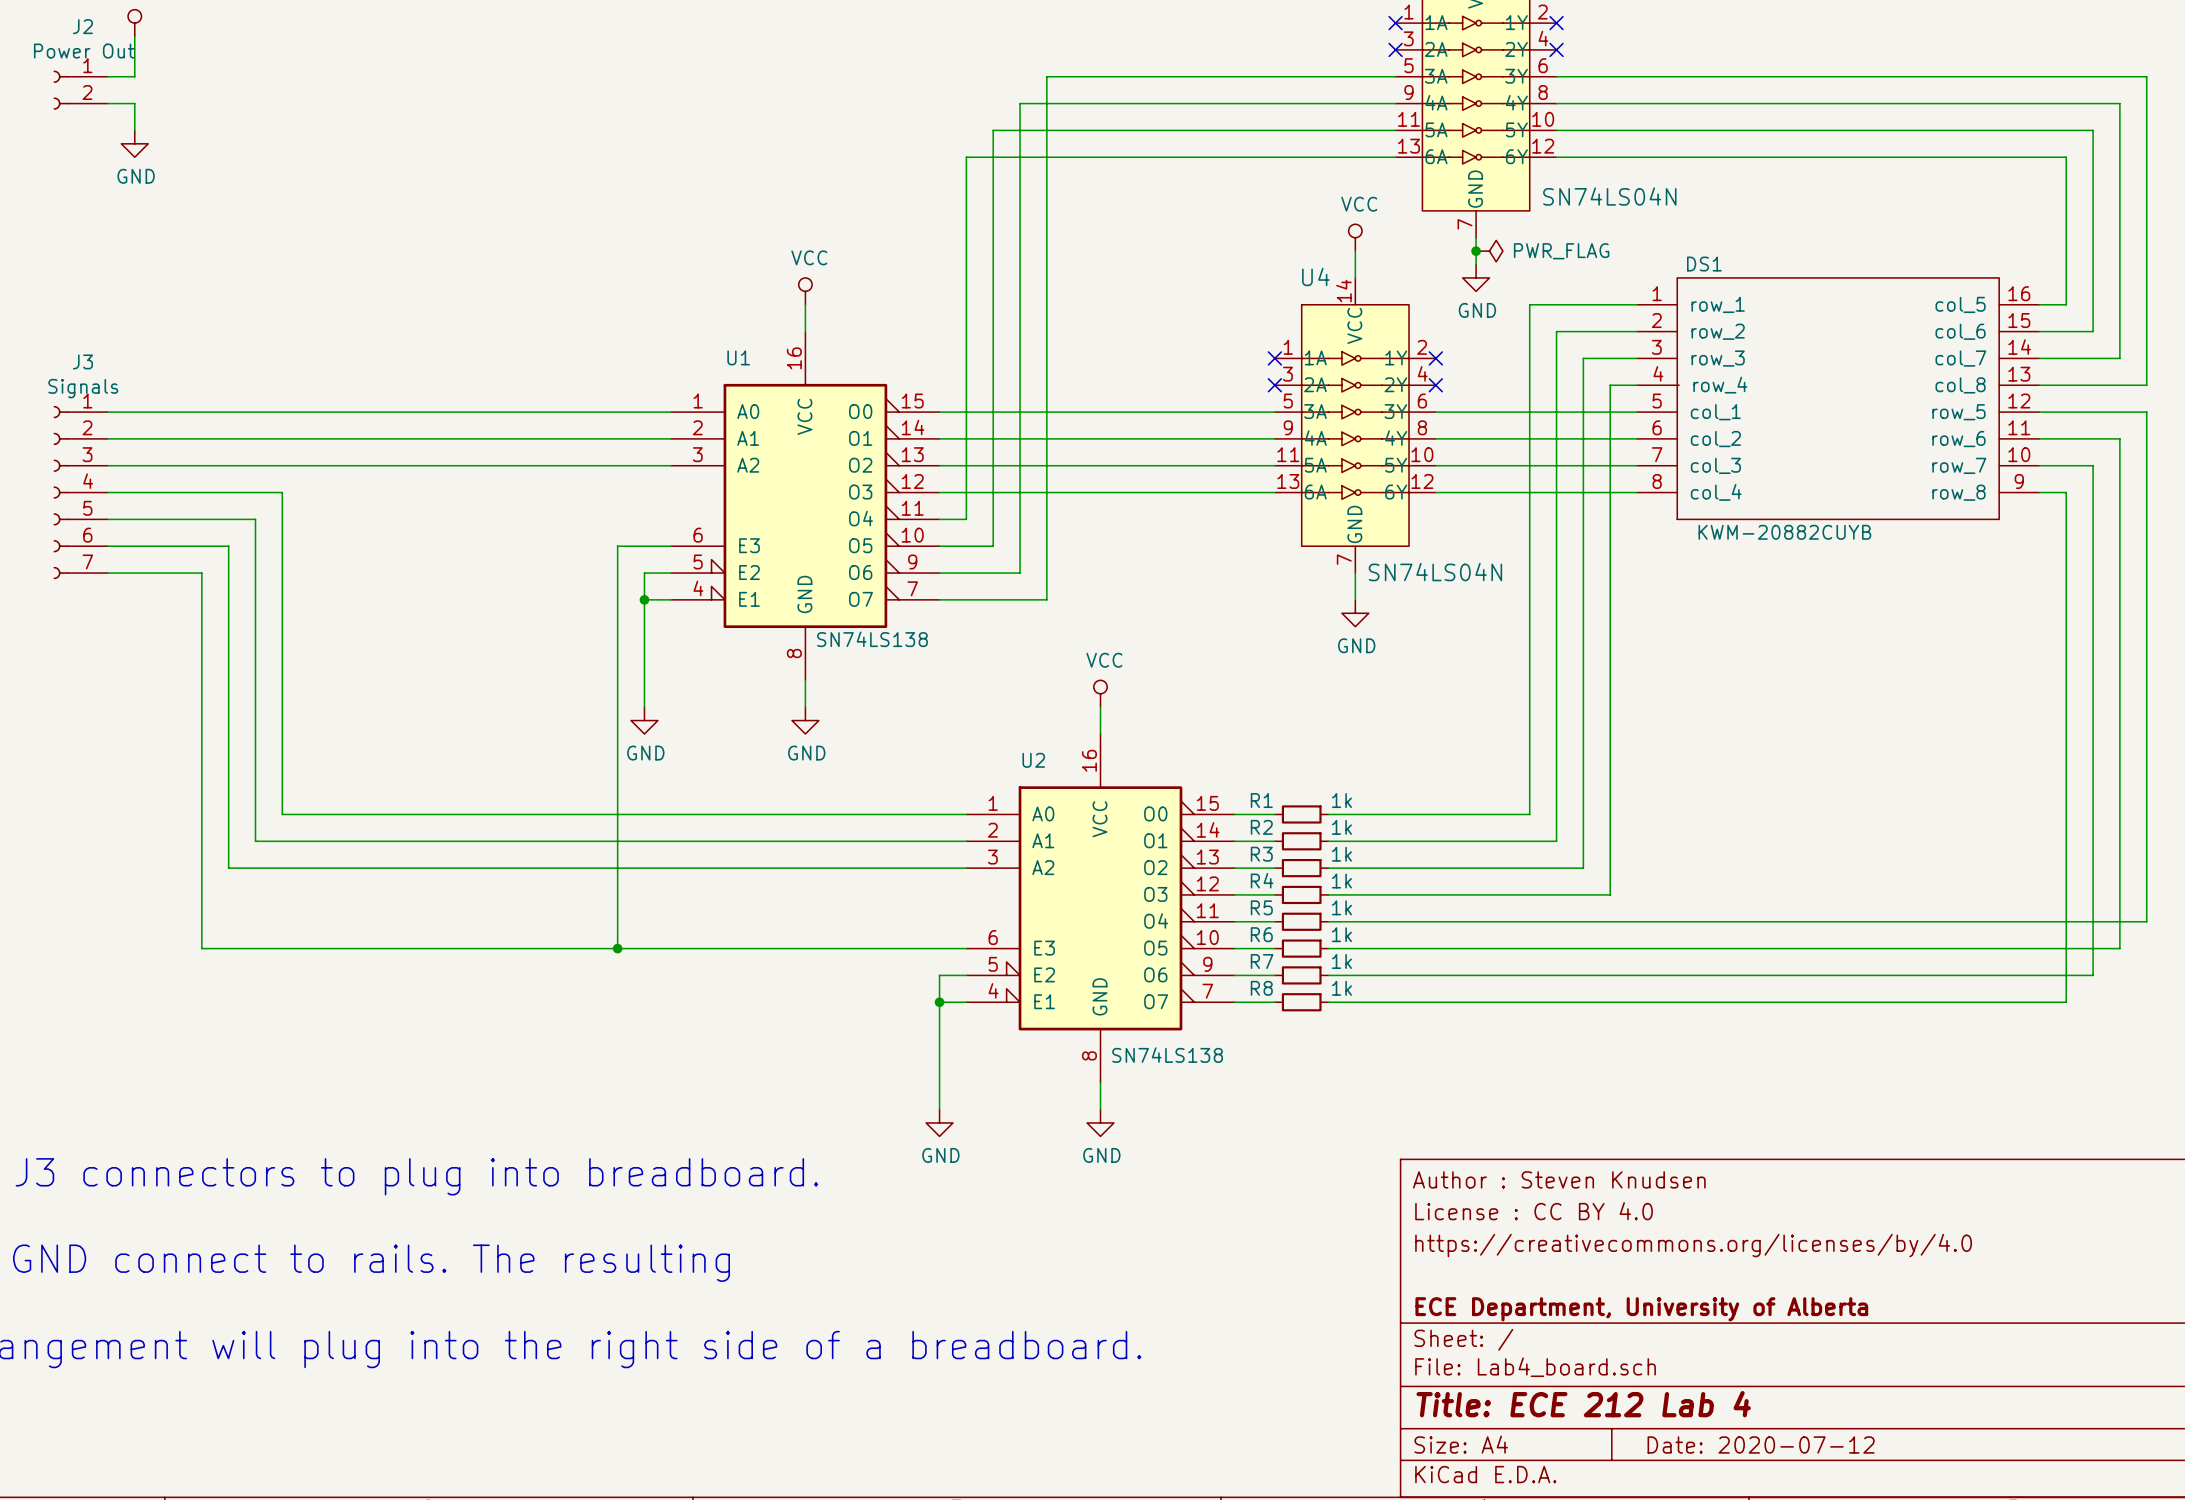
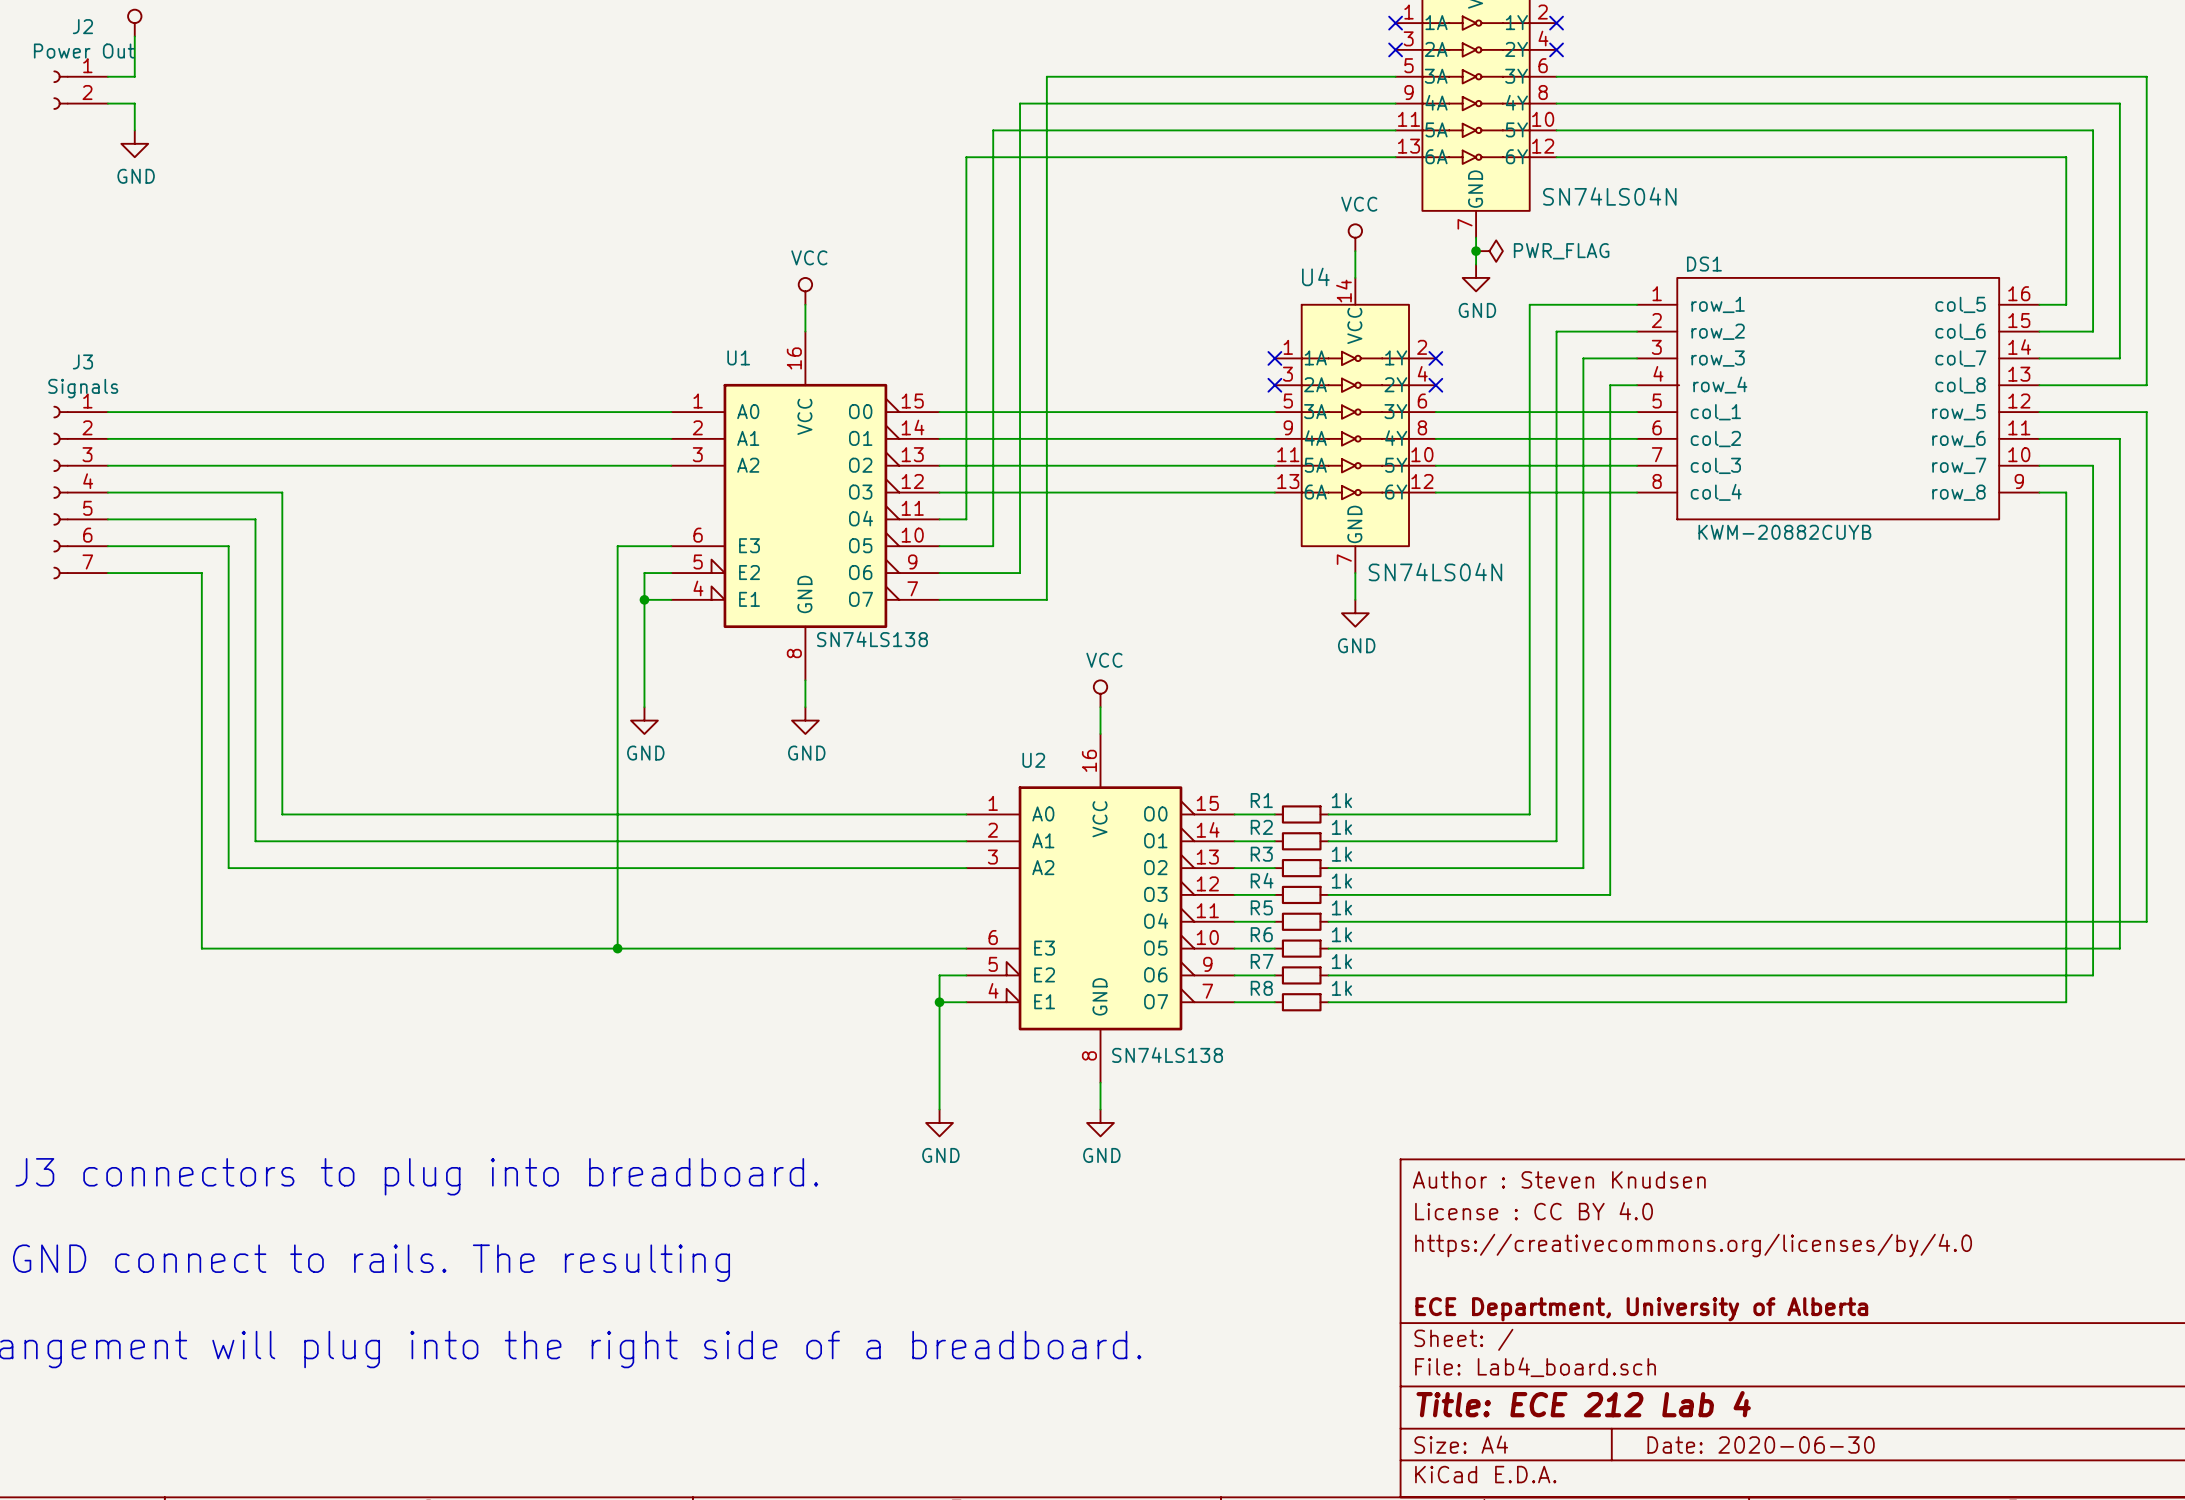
title block: Date: 2020-07-12 (1761, 1444) -> Date: 2020-06-30 (1761, 1444)

